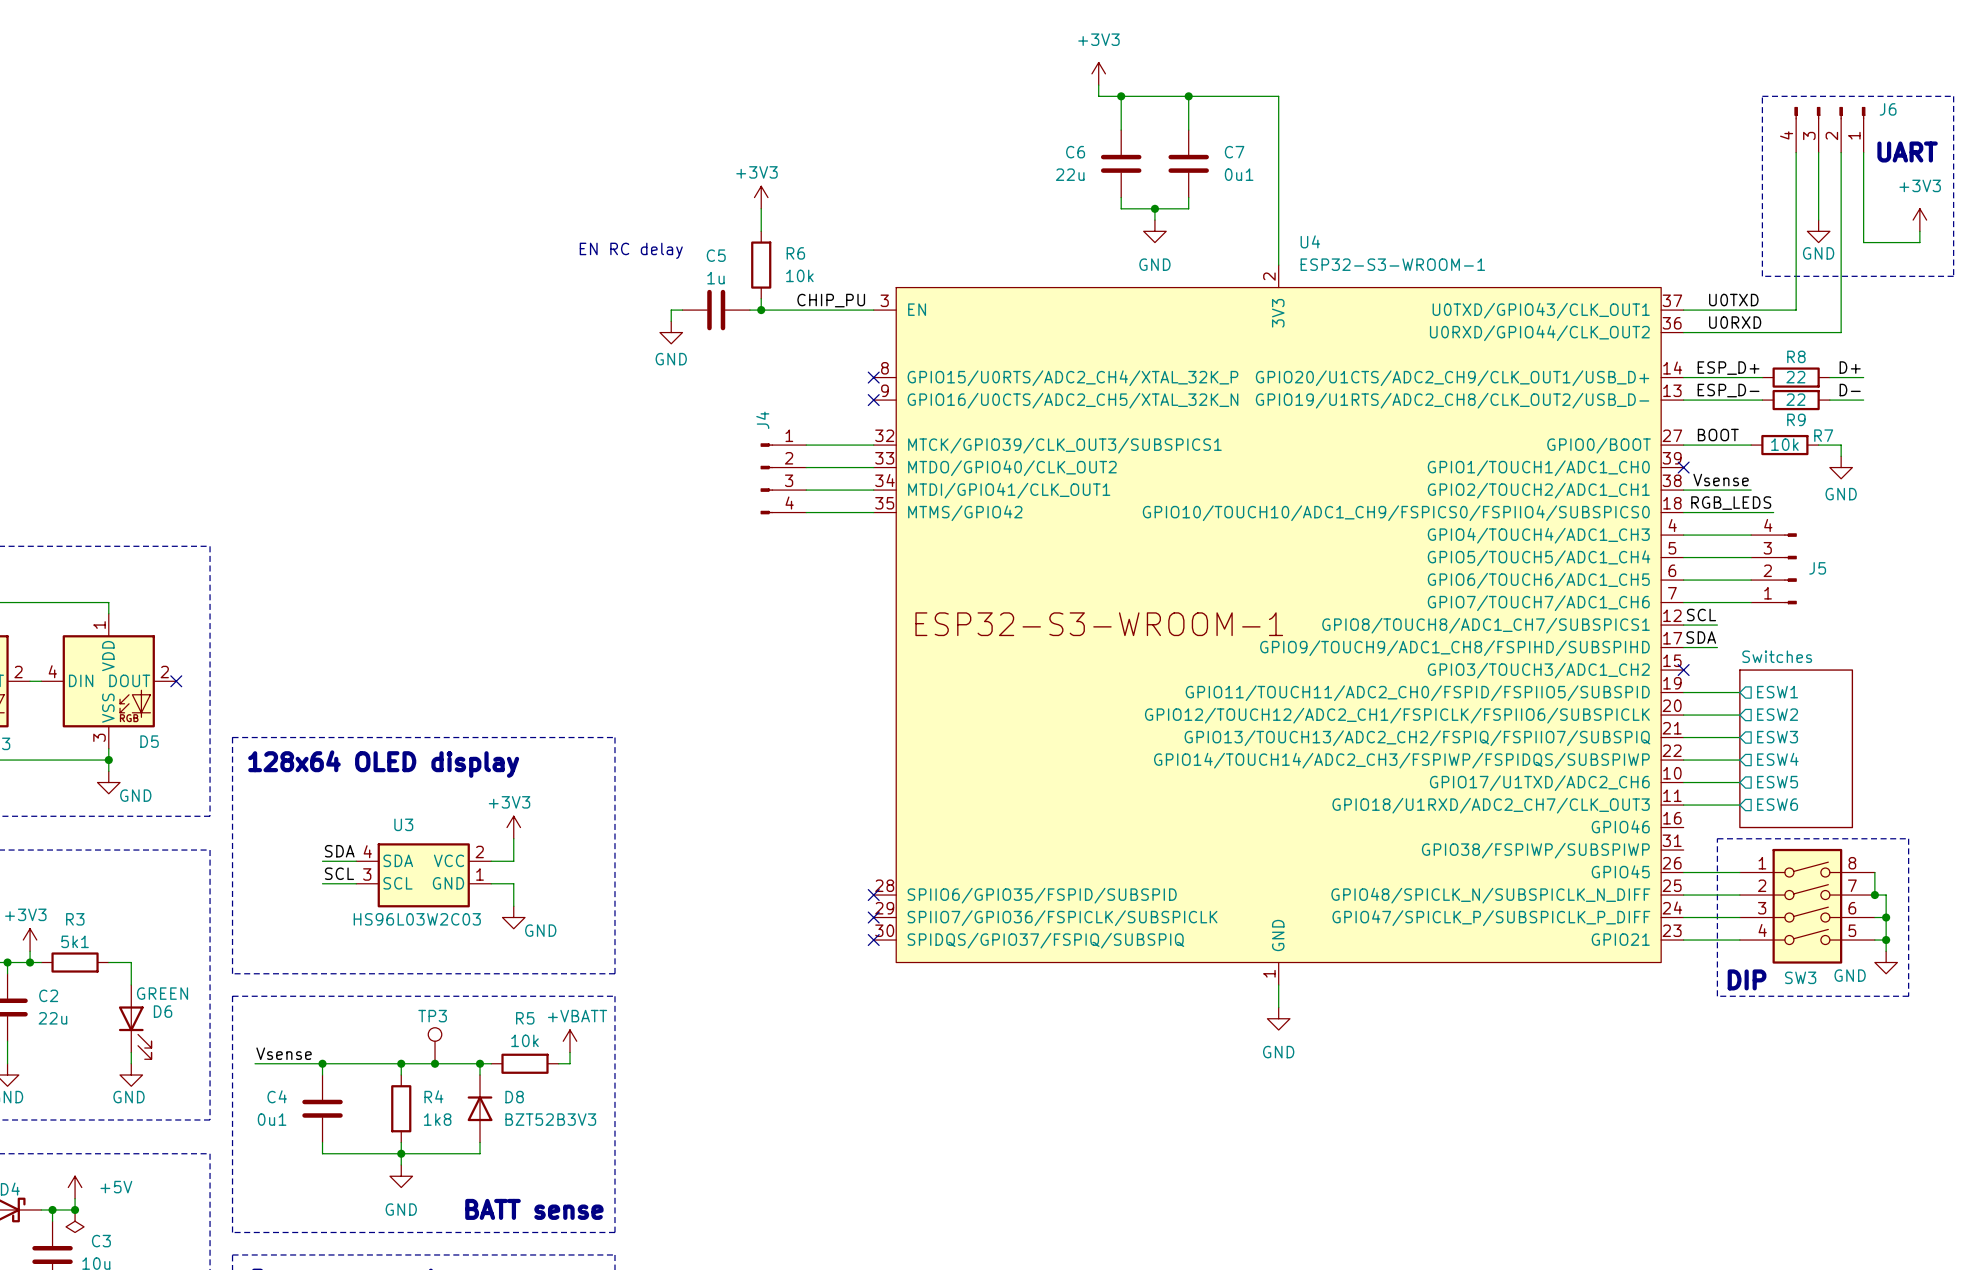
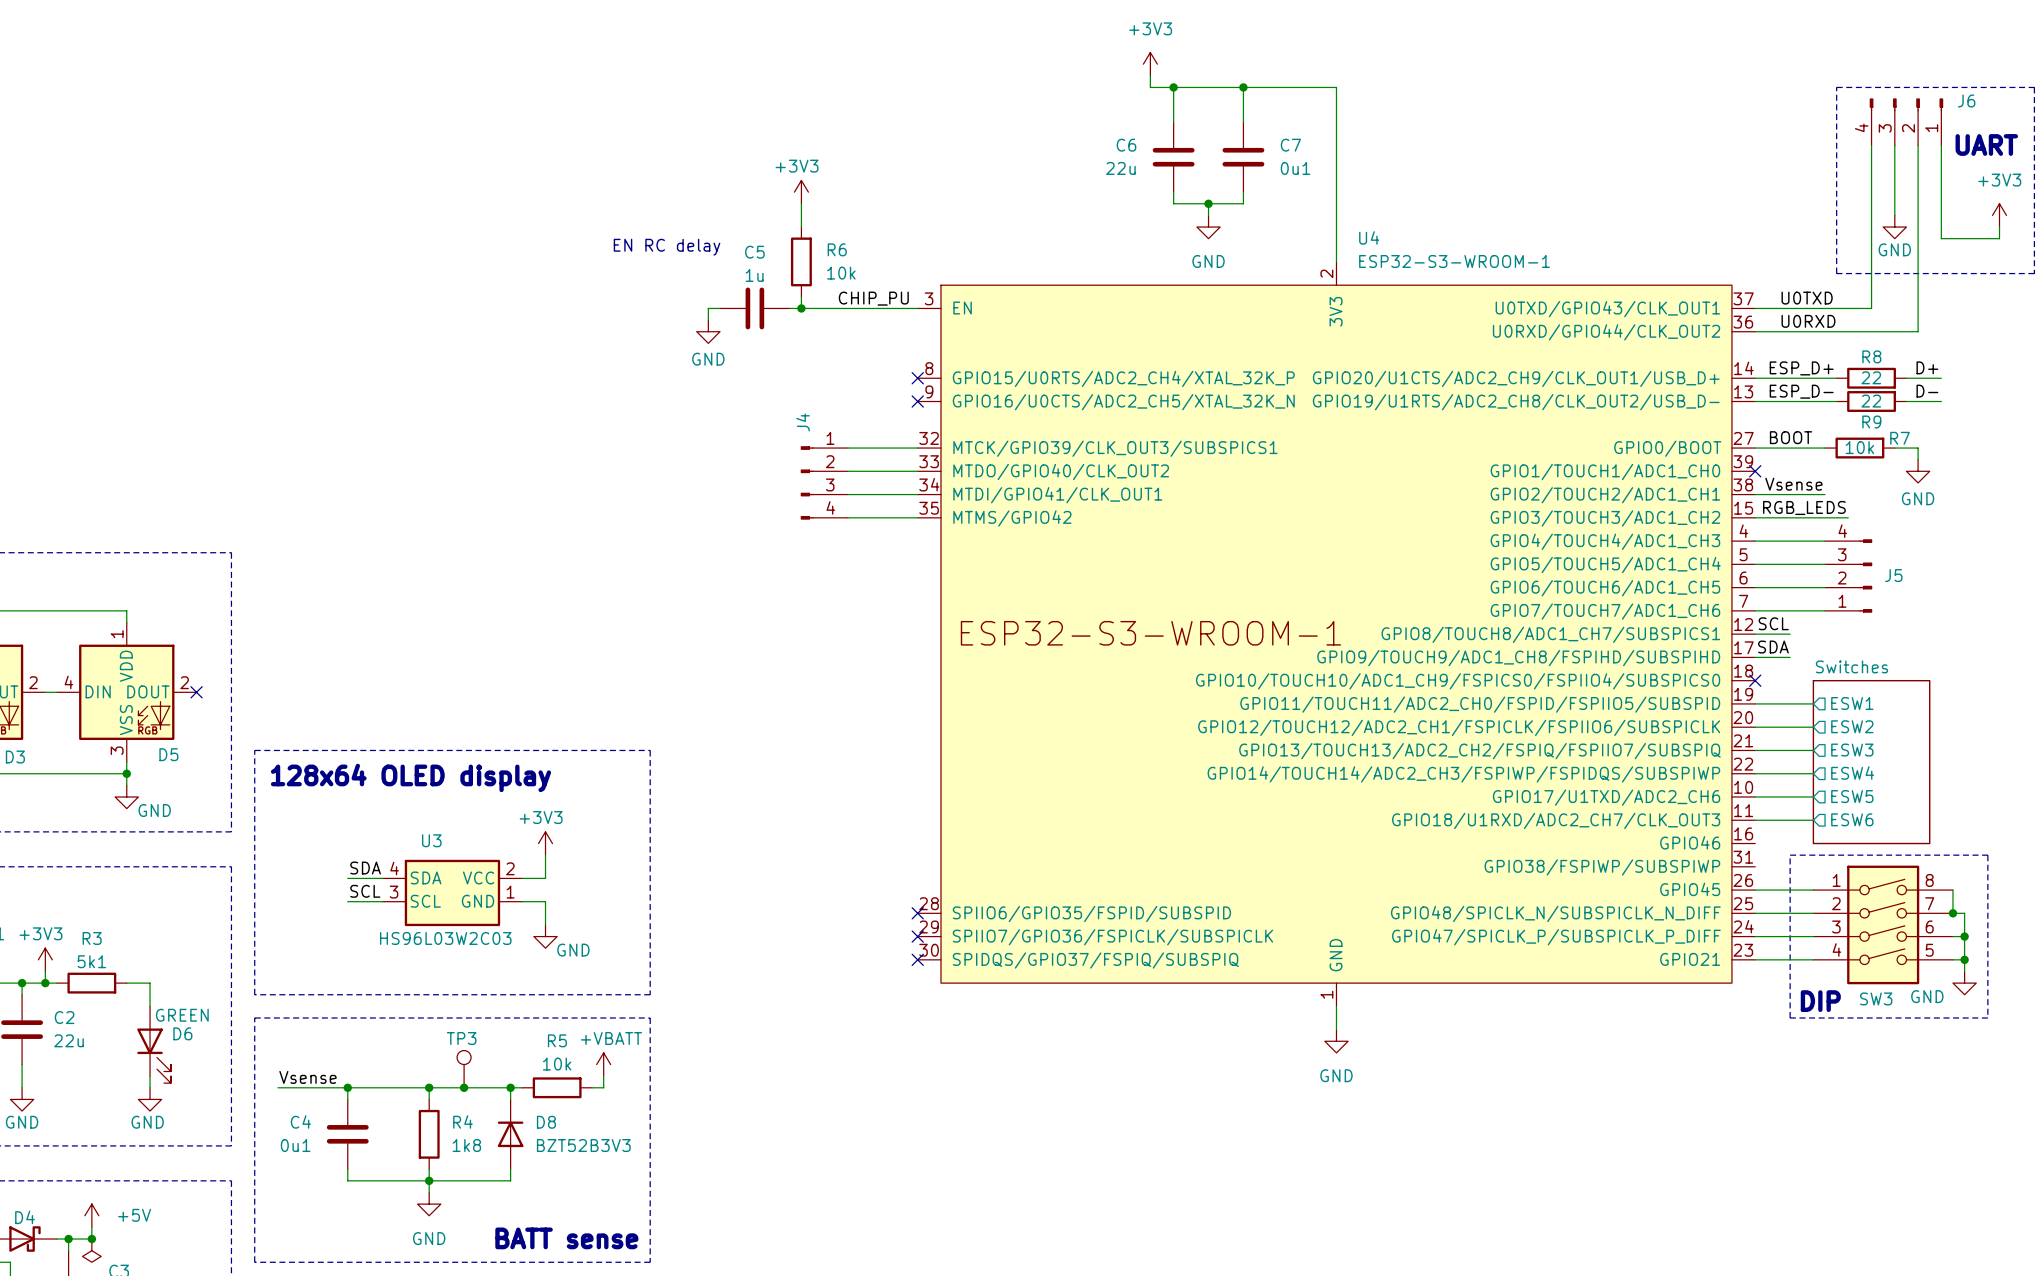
U4 pin number: 18 (1672, 503) -> 15 (1743, 508)
U4 pin name: GPIO10/TOUCH10/ADC1_CH9/FSPICS0/FSPIIO4/SUBSPICS0 (1396, 513) -> GPIO3/TOUCH3/ADC1_CH2 (1605, 518)
U4 pin number: 15 (1672, 660) -> 18 (1743, 671)
U4 pin name: GPIO3/TOUCH3/ADC1_CH2 (1538, 670) -> GPIO10/TOUCH10/ADC1_CH9/FSPICS0/FSPIIO4/SUBSPICS0 (1458, 681)

